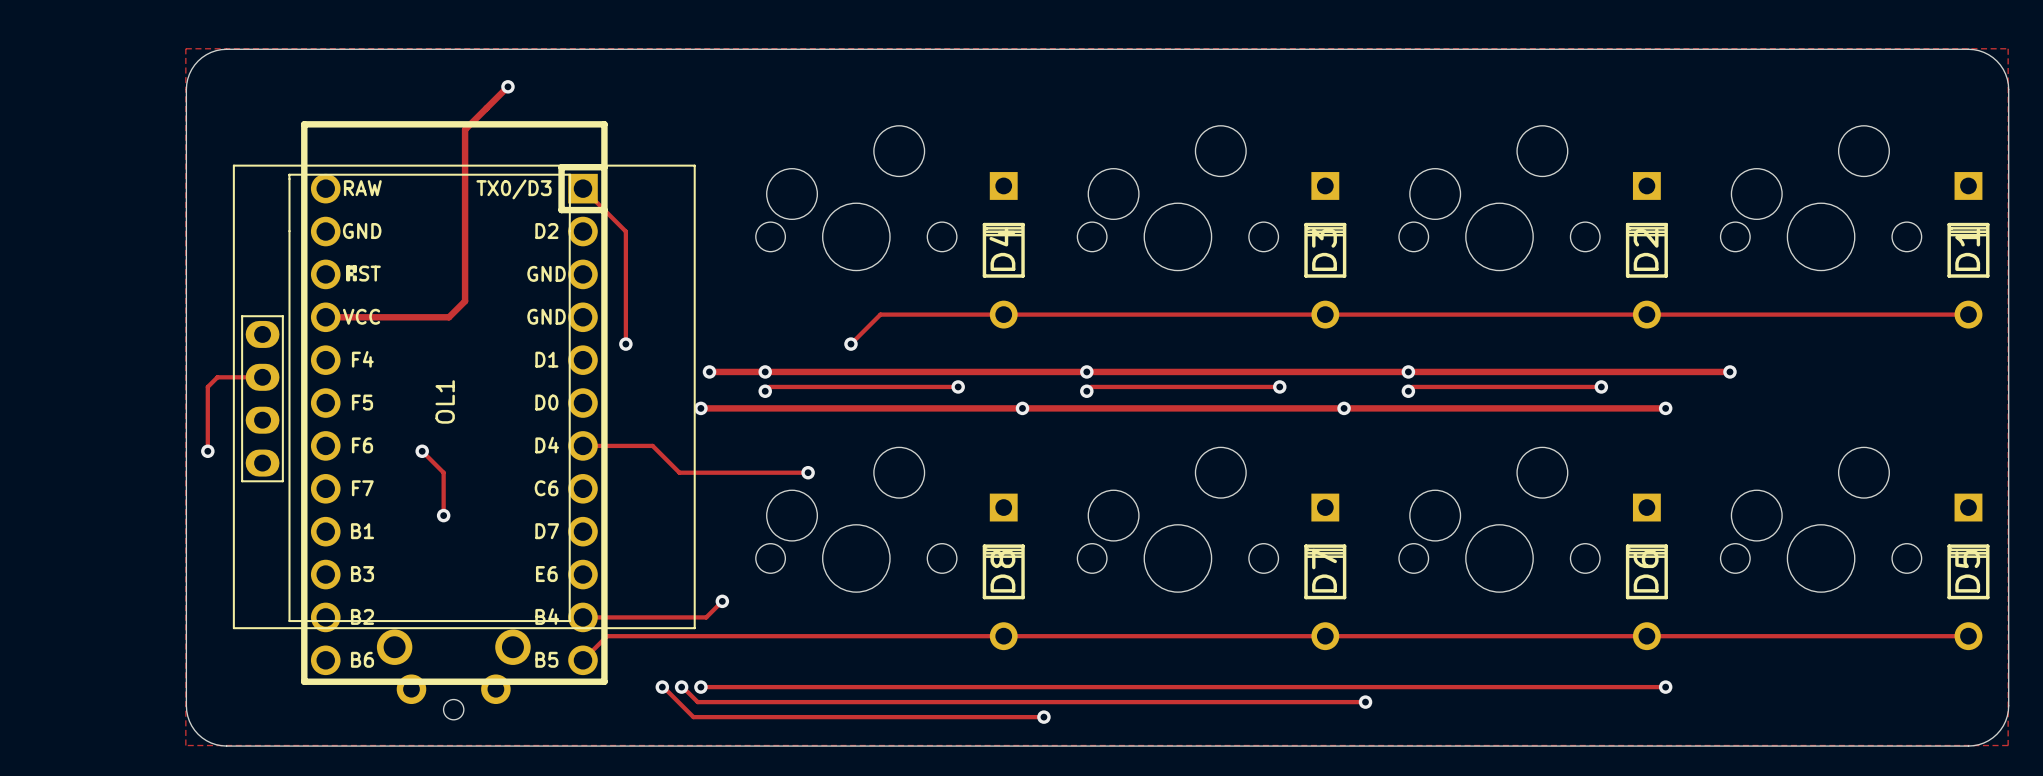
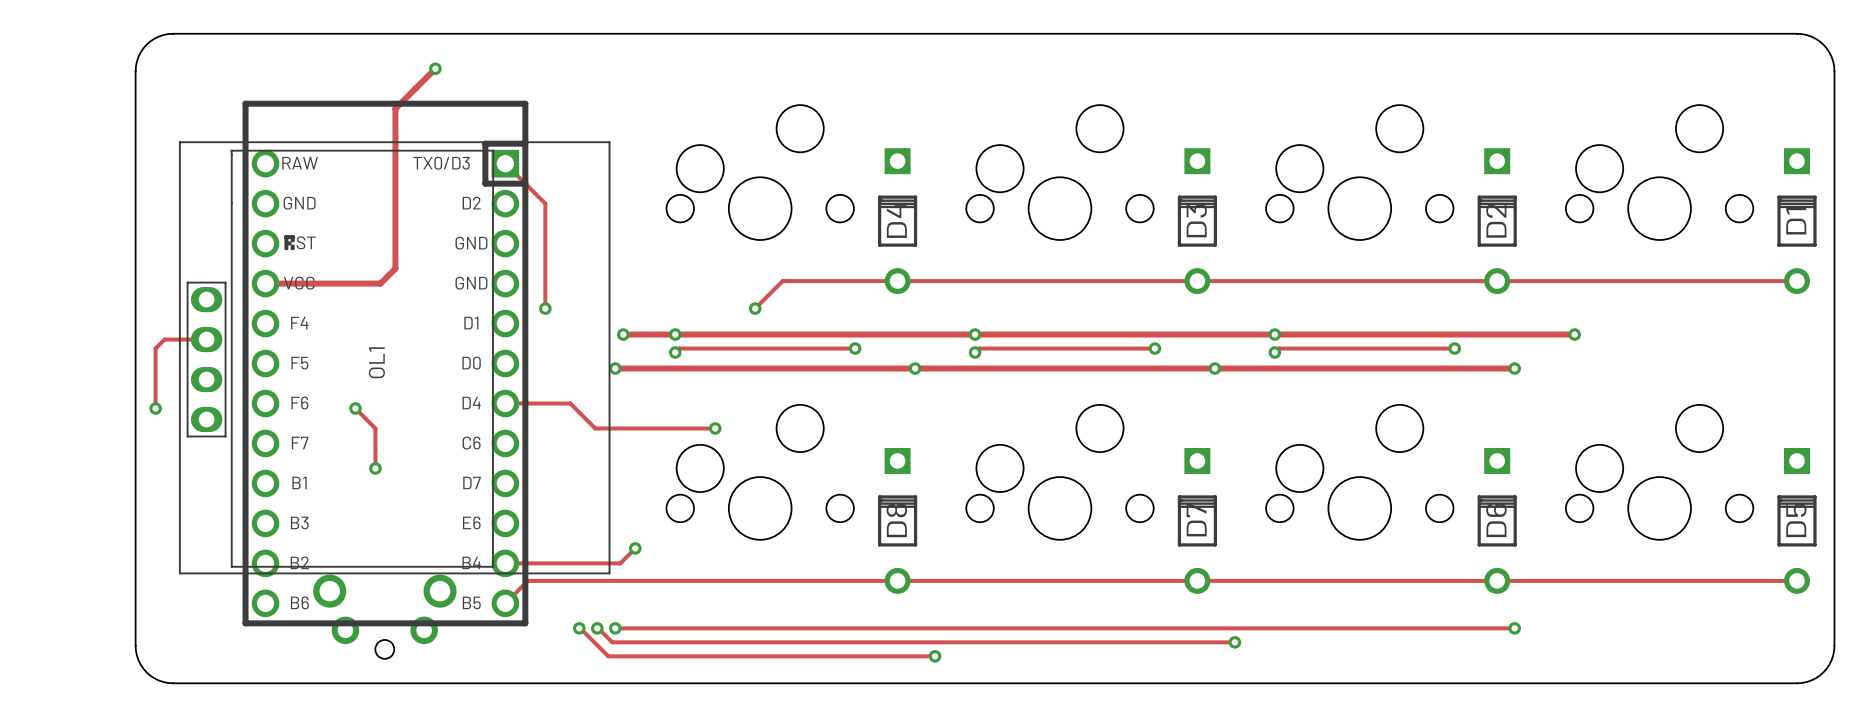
zone outline: (185, 48) (185, 745) (2008, 745) (2008, 48) (185, 48) -> none

